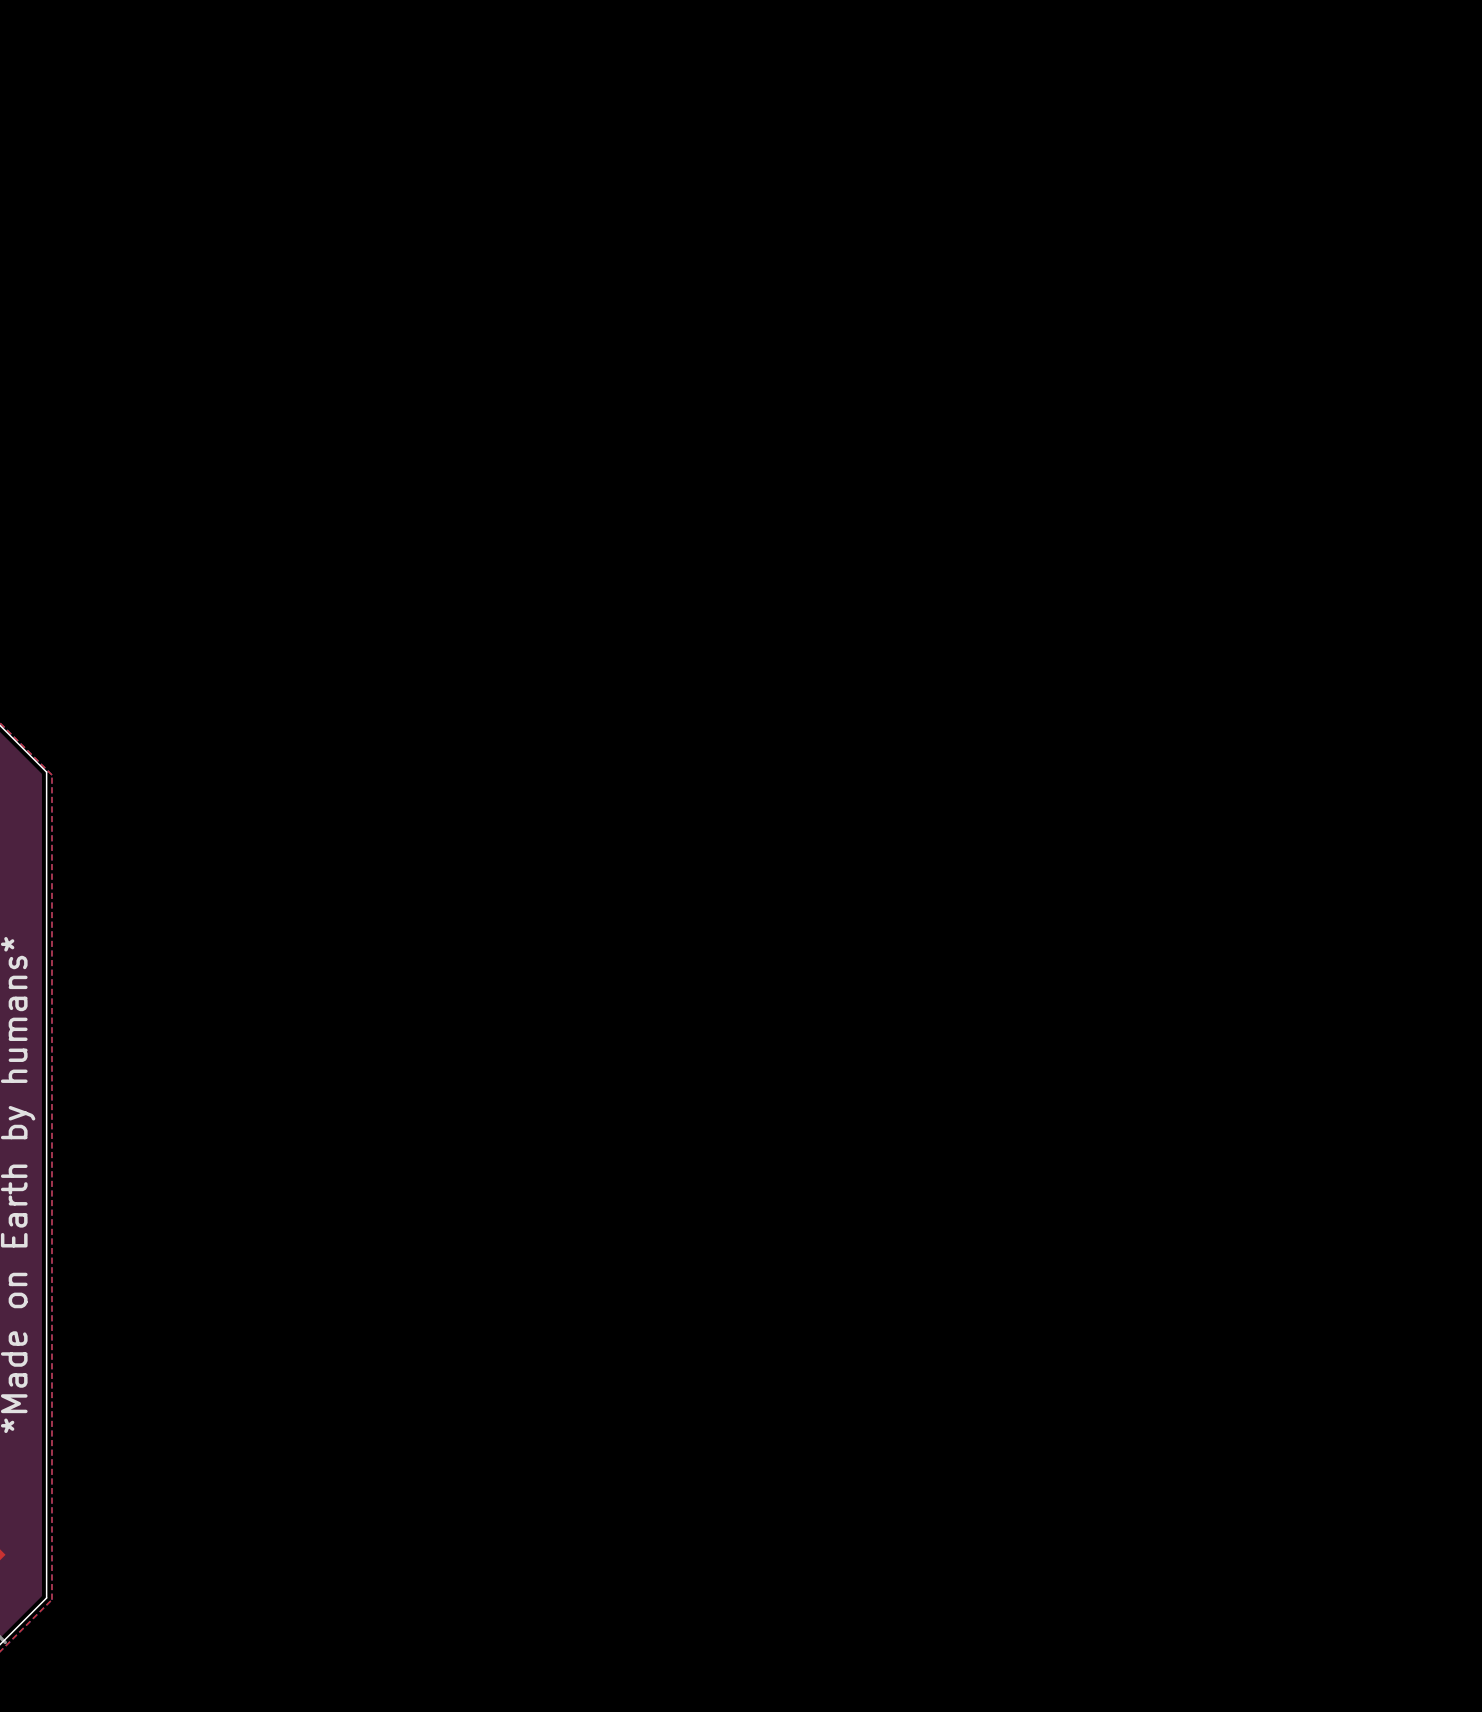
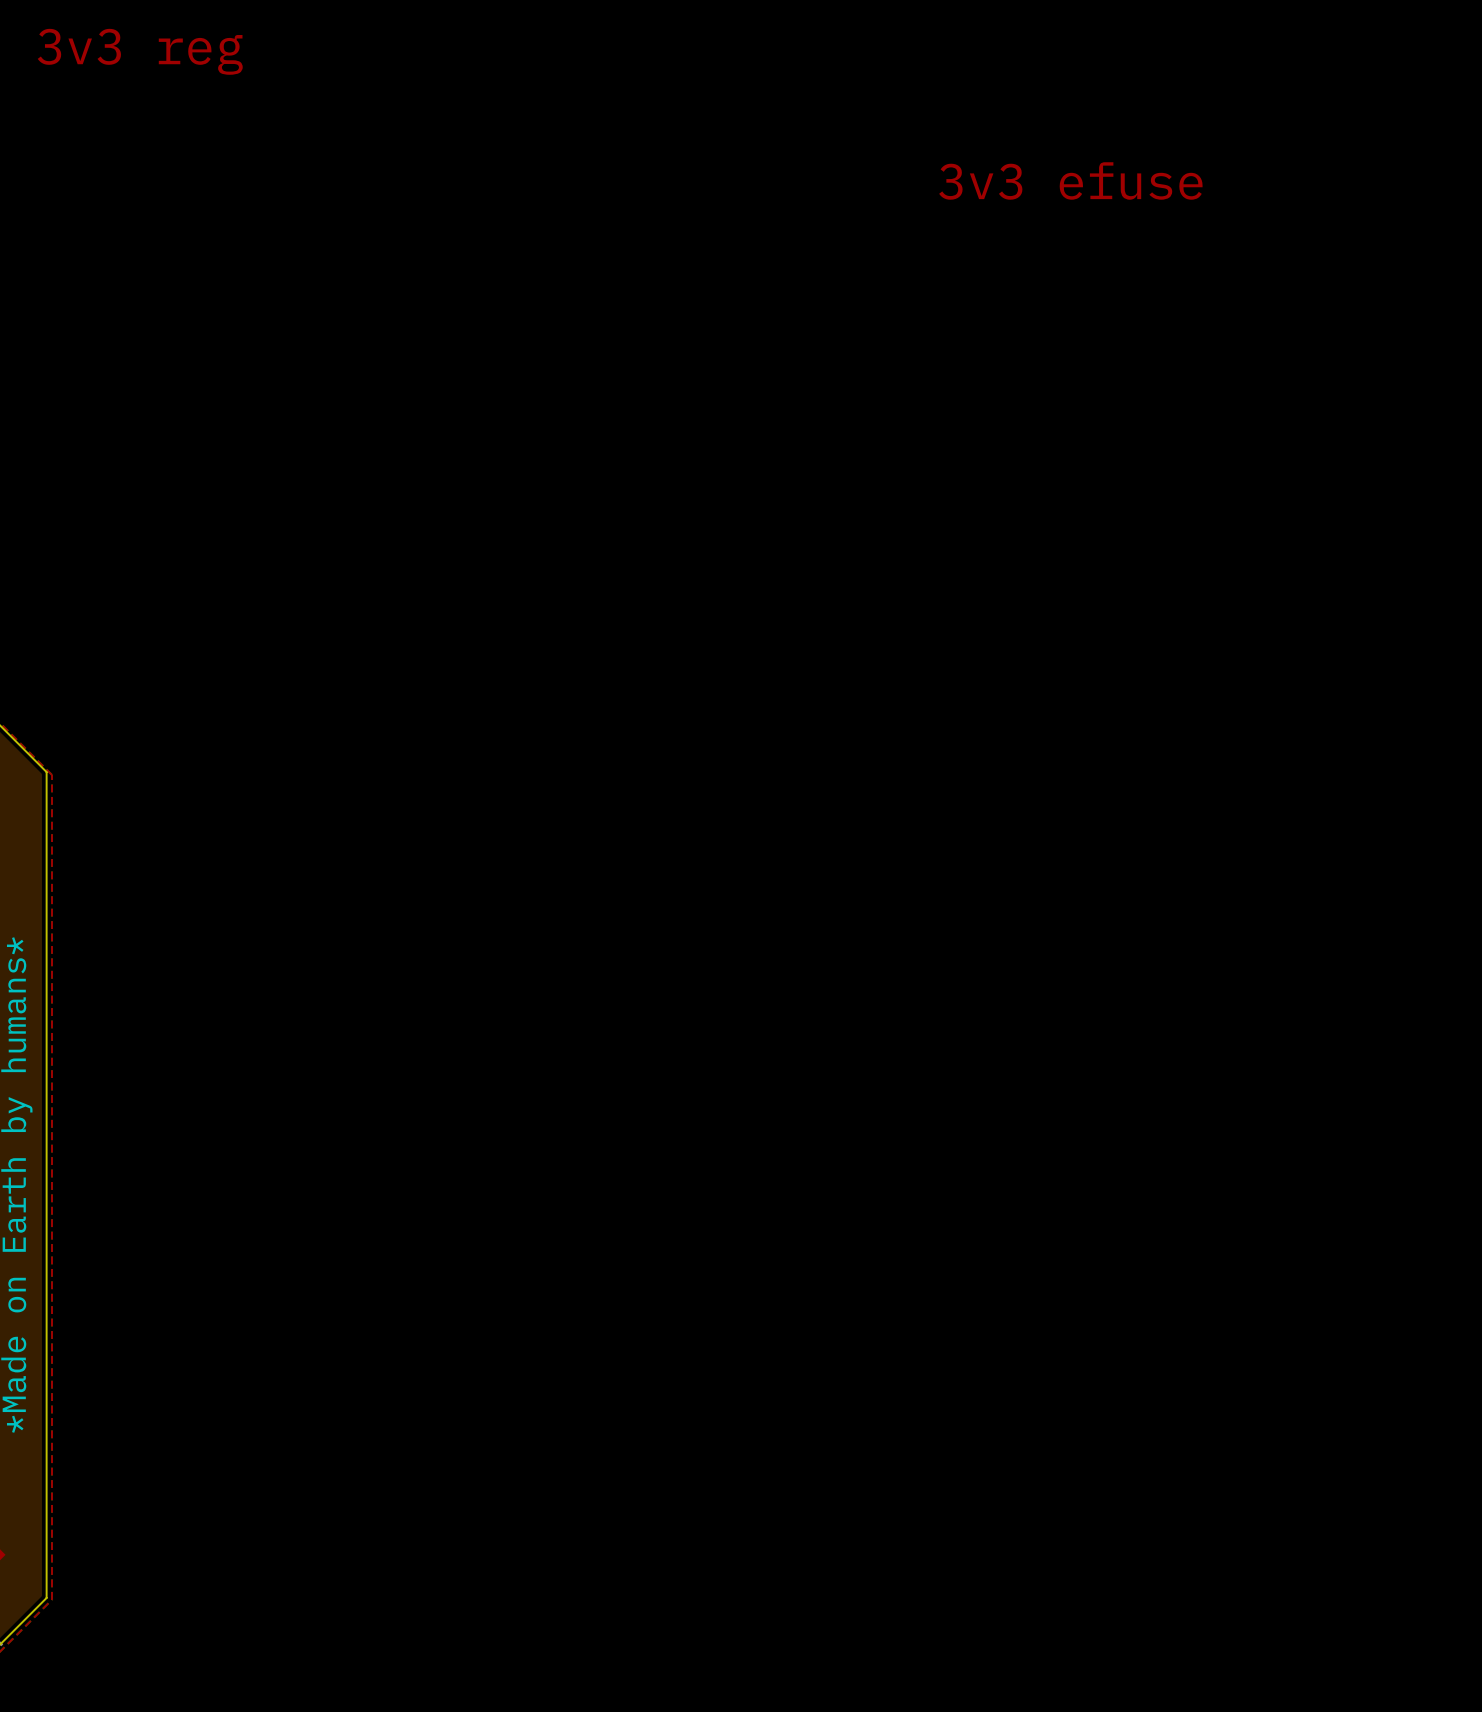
text: none -> 3v3 reg (140, 51)
text: none -> 3v3 efuse (1070, 180)

